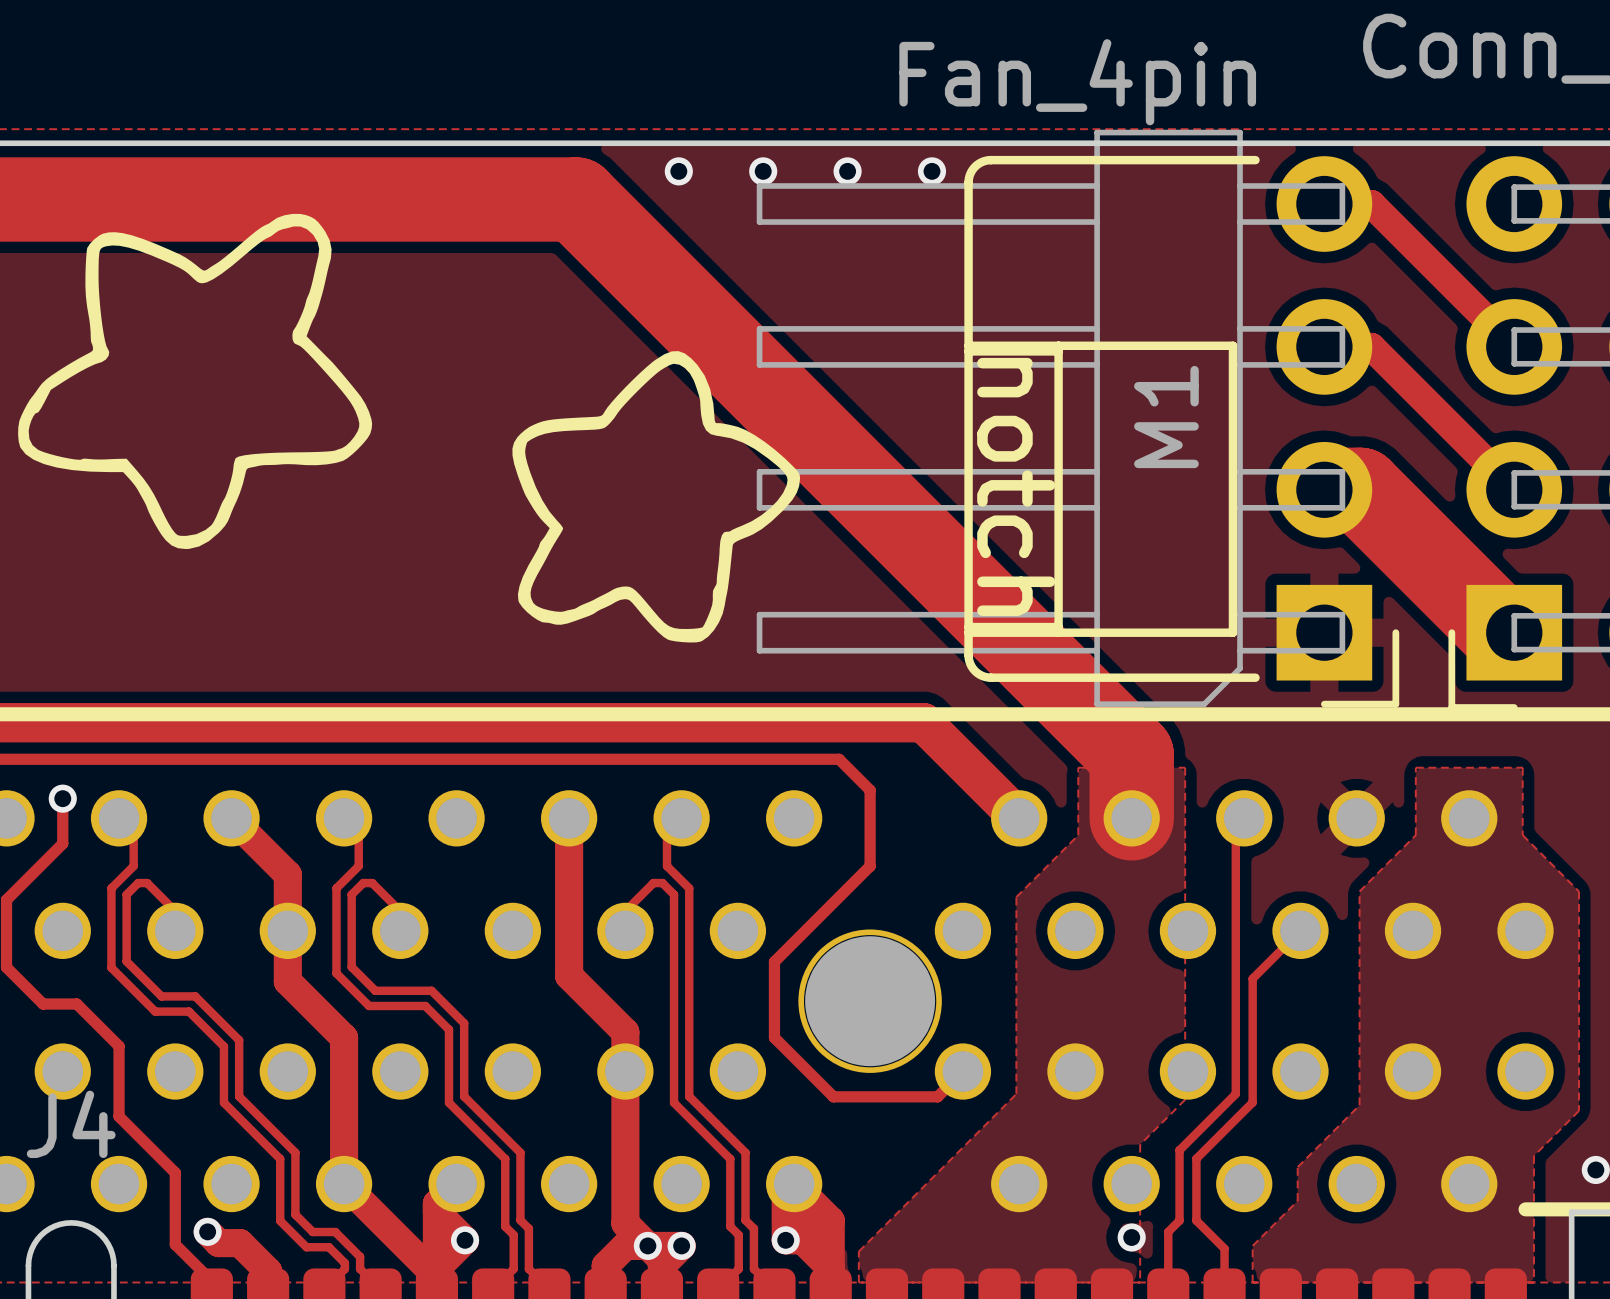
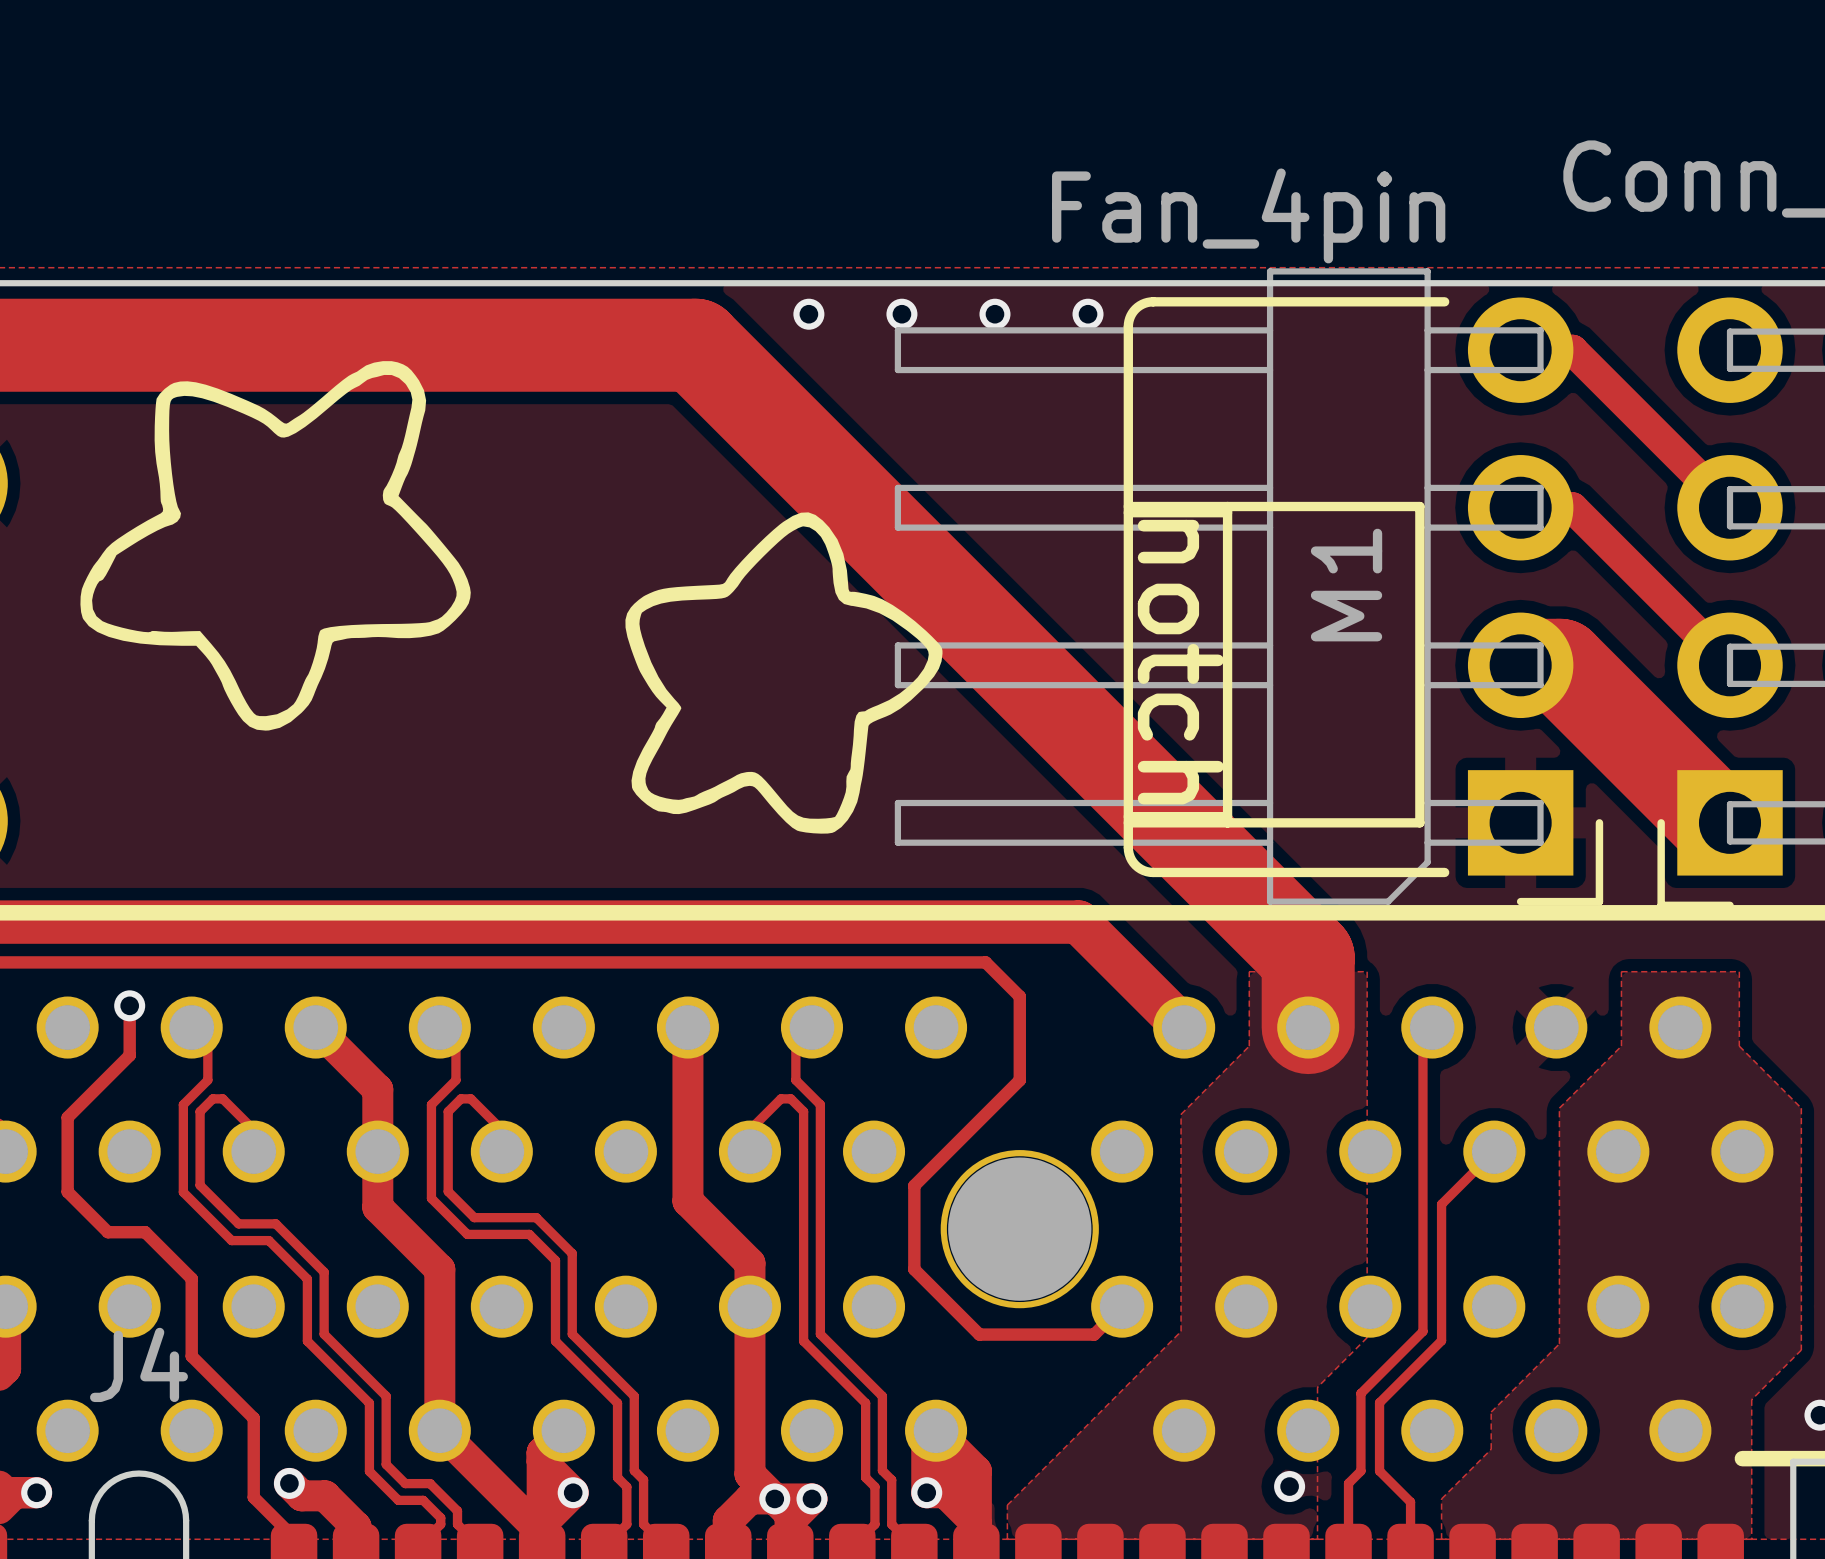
via position: (1131, 1237) -> (1289, 1486)

